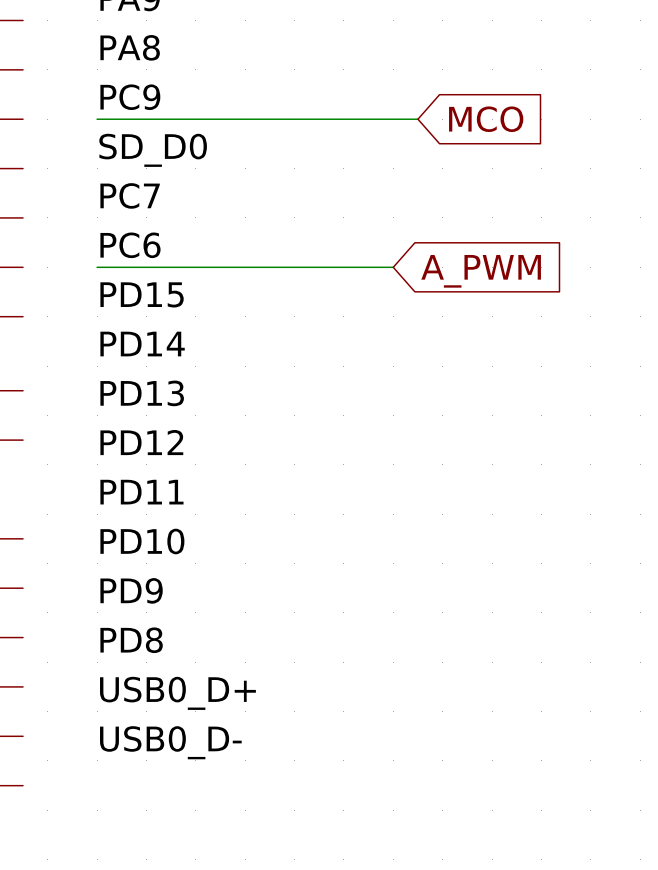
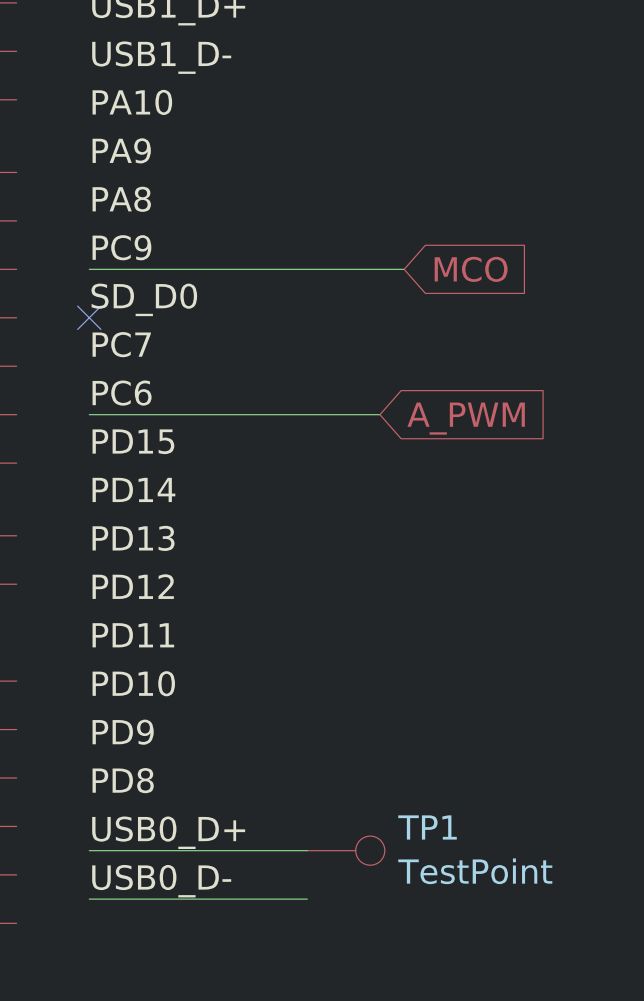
no-connect mark: none -> (89, 317)
wire: none -> (89, 850) (307, 850)
TP1: none -> TestPoint (346, 850)
wire: none -> (89, 899) (307, 899)

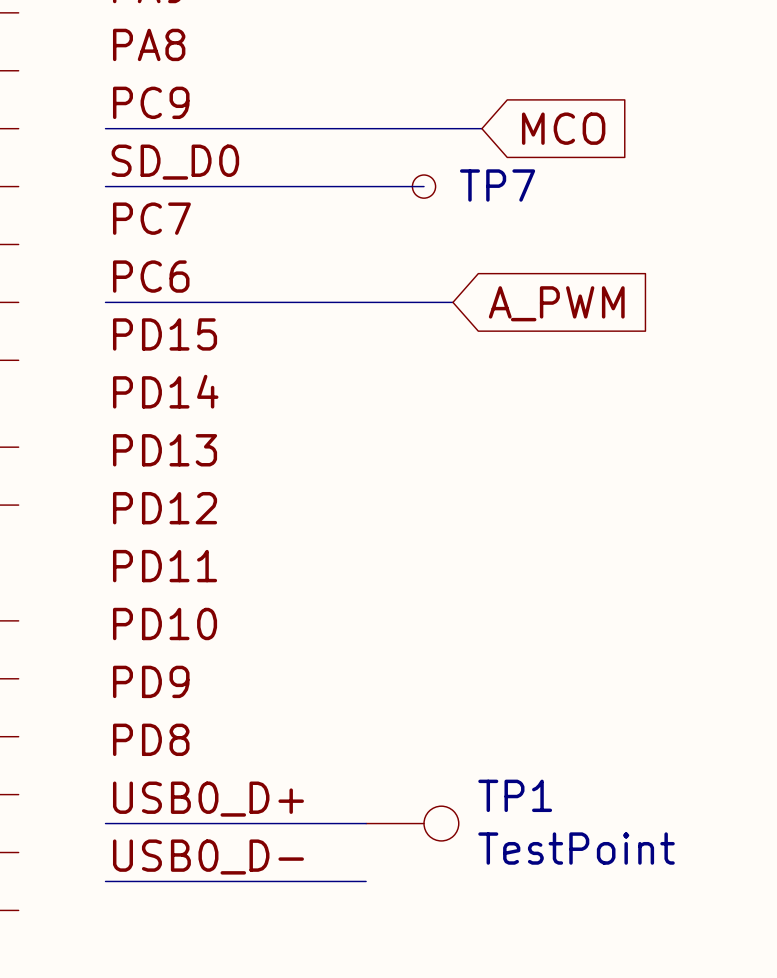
wire: none -> (105, 186) (424, 186)
no-connect mark: (89, 317) -> none
TP7: none -> (424, 186)

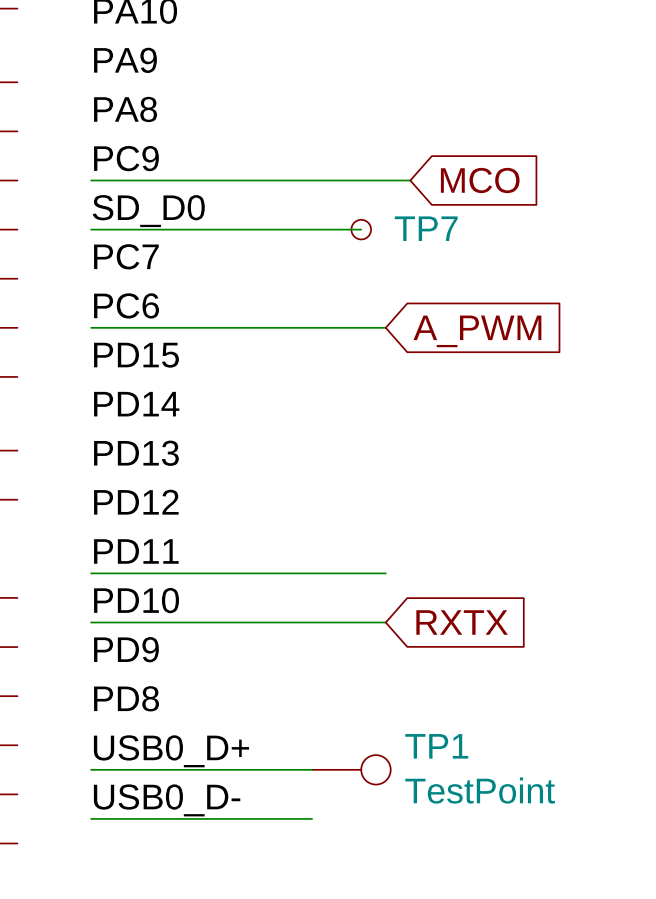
wire: none -> (91, 573) (385, 573)
wire: none -> (91, 622) (385, 622)
global label: none -> RXTX (462, 622)

